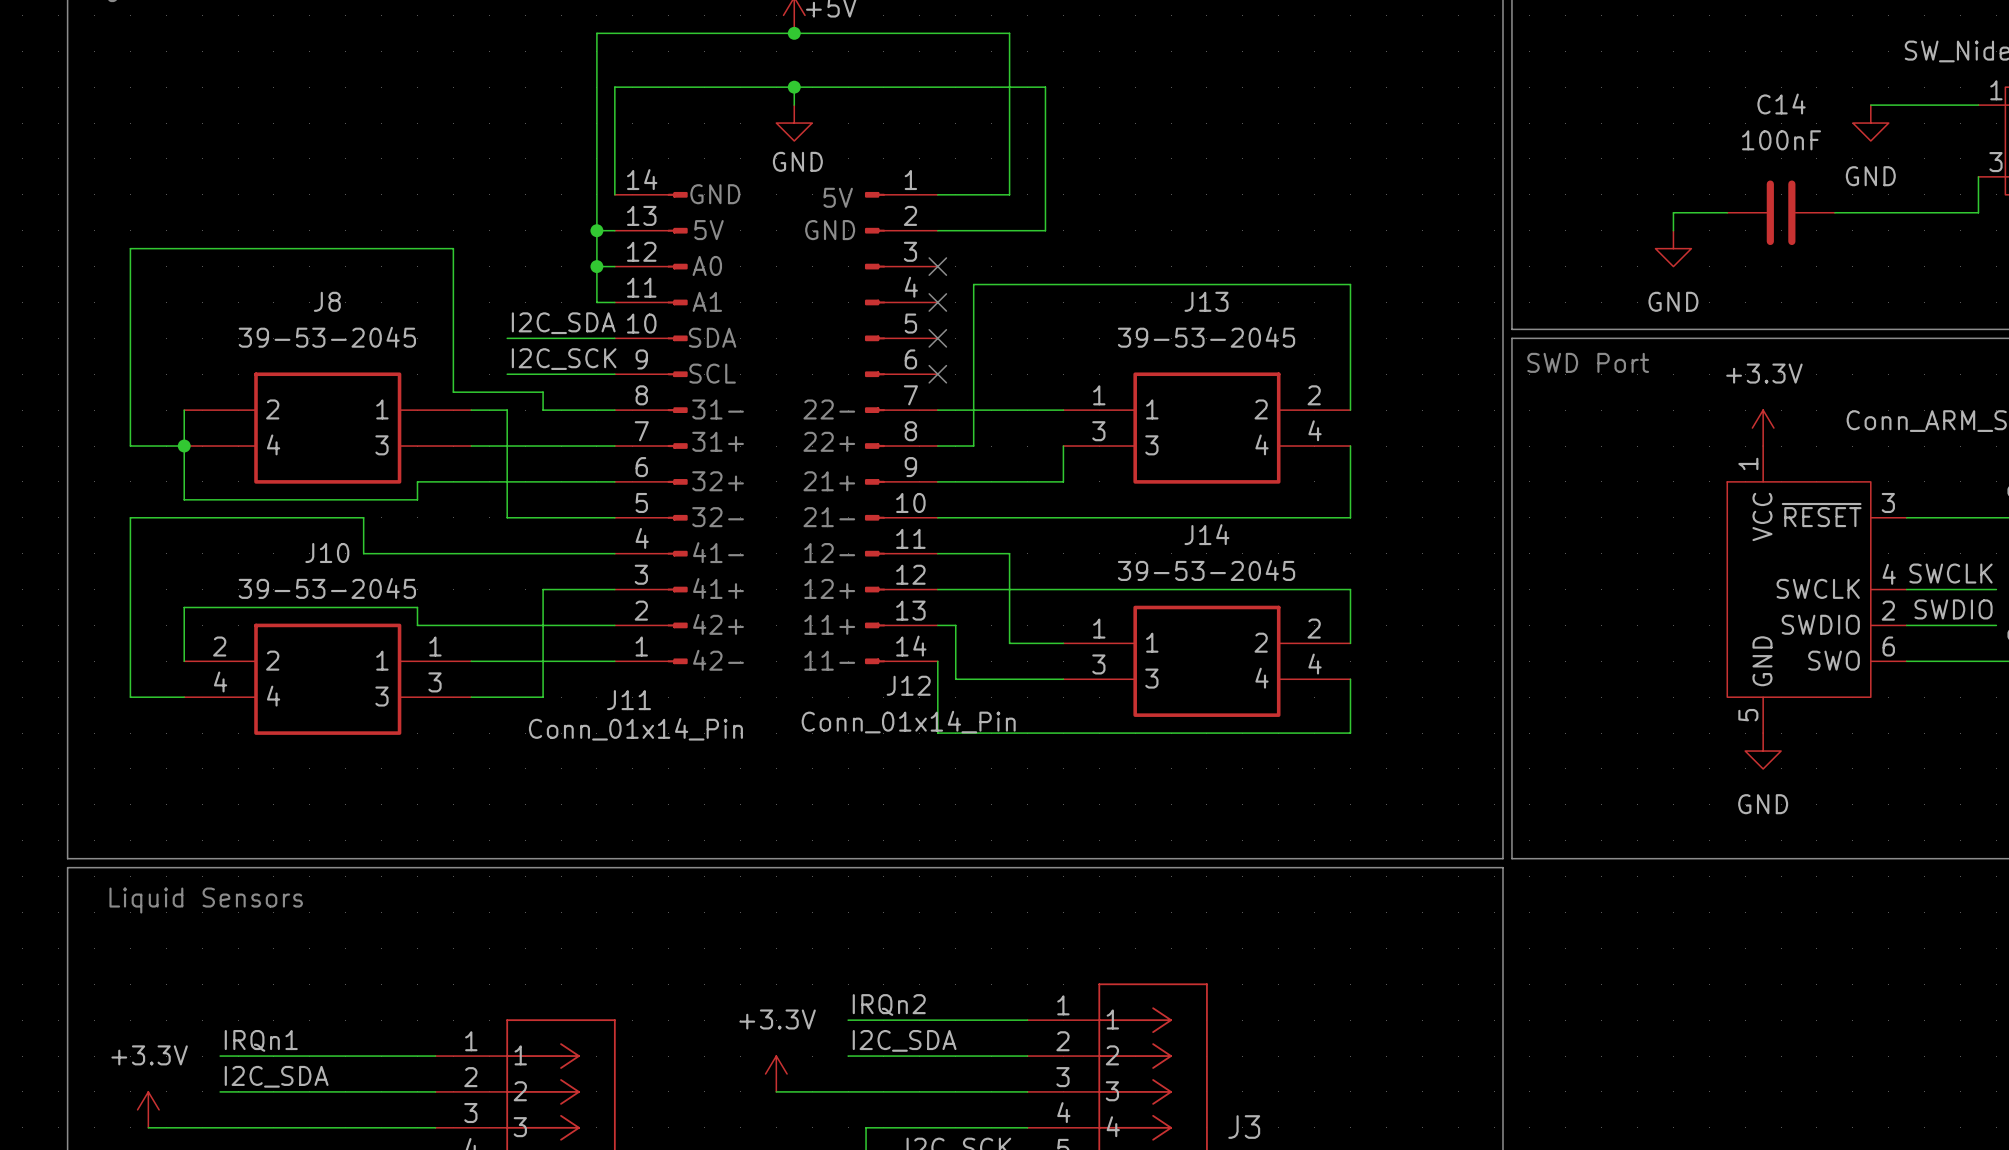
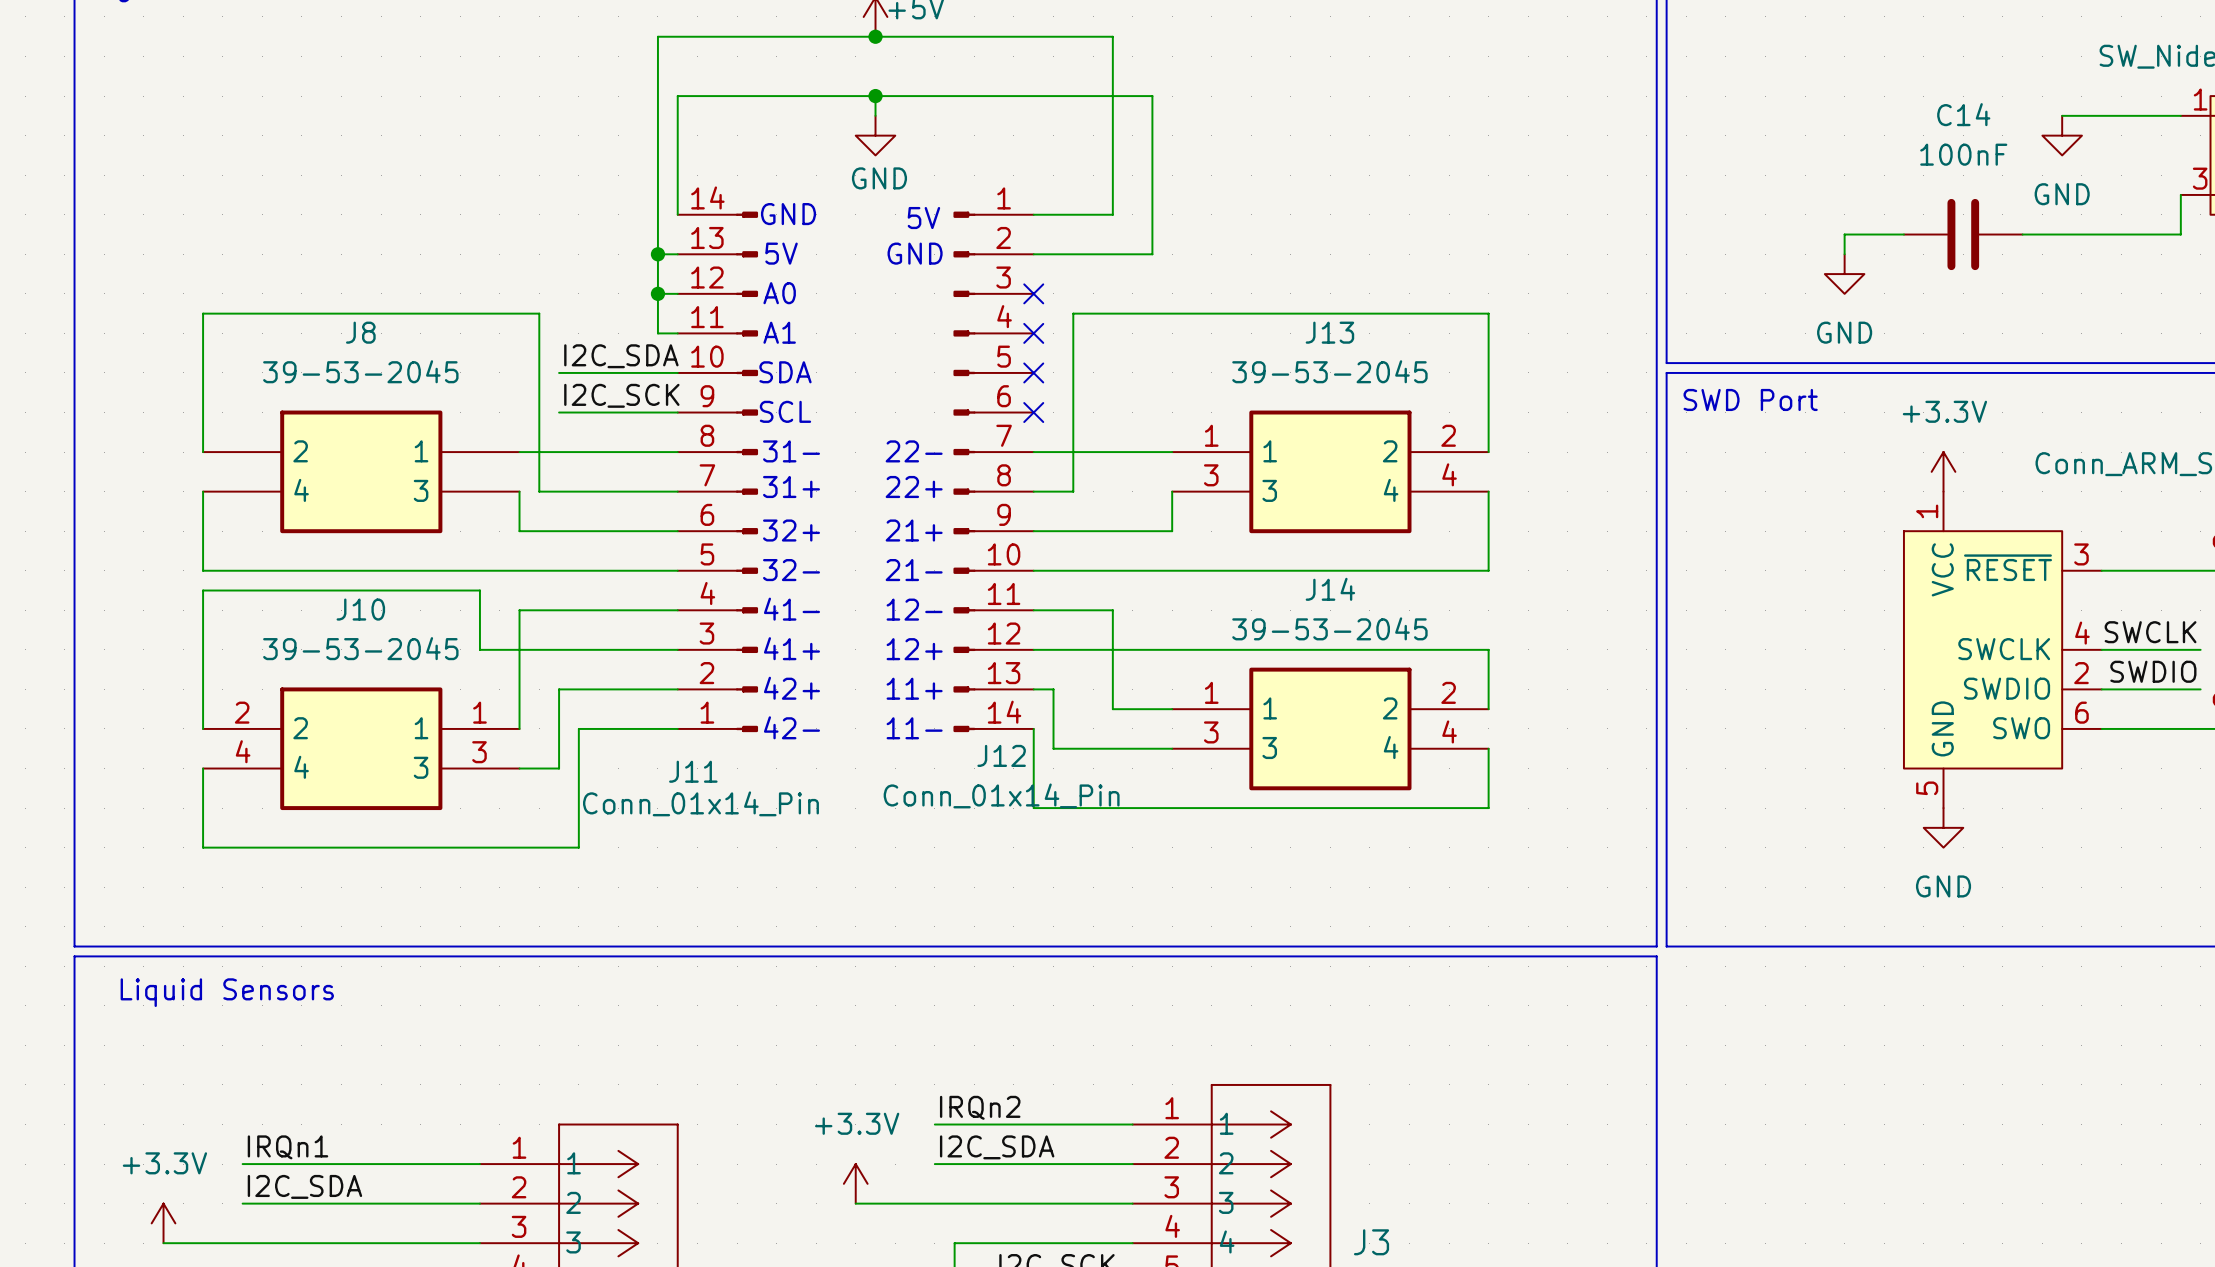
wire: (184, 410) (184, 446) (130, 446) (130, 248) (453, 248) (453, 392) (543, 392) (543, 410) -> (203, 452) (203, 313) (539, 313) (539, 491)
wire: (507, 410) (507, 517) -> (559, 452) (598, 452)
junction: (184, 446) -> none
wire: (471, 446) (489, 446) -> (519, 491) (519, 531)
wire: (471, 481) (417, 481) (417, 499) (184, 499) -> none
wire: (184, 517) (130, 517) (130, 697) (184, 697) -> (203, 570) (203, 550)
wire: (363, 517) (363, 553) (471, 553) -> (400, 570) (559, 570)
wire: (543, 589) (543, 697) (507, 697) -> (559, 689) (559, 768)
wire: (184, 607) (417, 607) (417, 625) (507, 625) -> (203, 669) (203, 590) (479, 590) (479, 649) (598, 649)
wire: (471, 661) (525, 661) -> (519, 728) (519, 610)
wire: none -> (578, 728) (578, 847) (203, 847) (203, 768)

